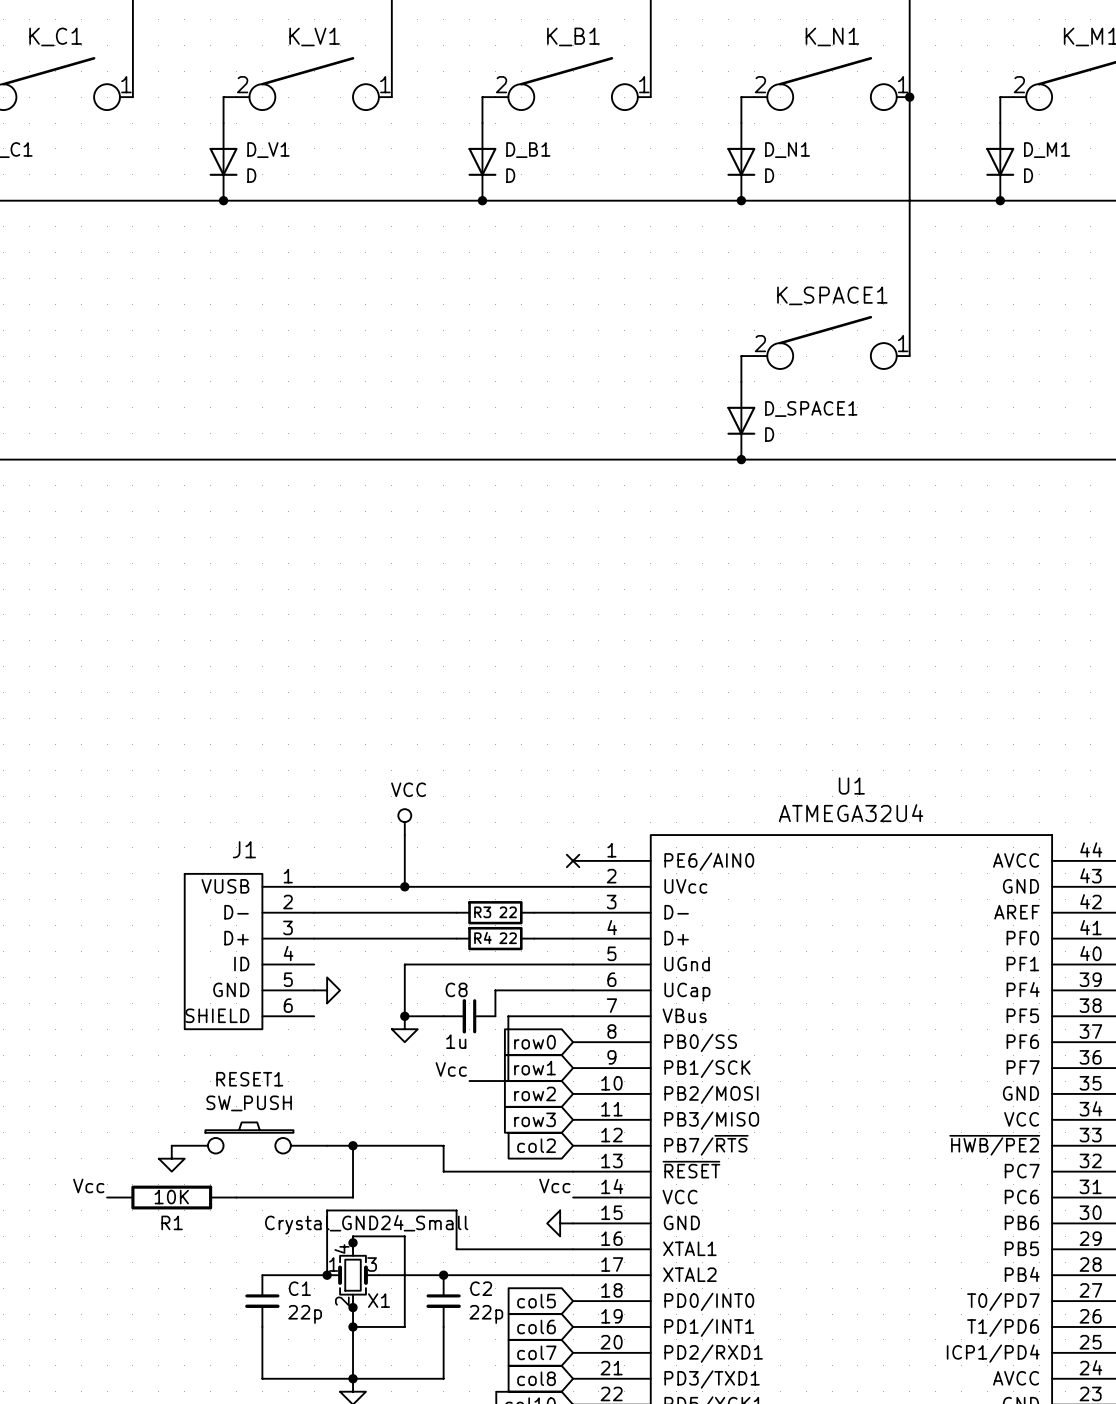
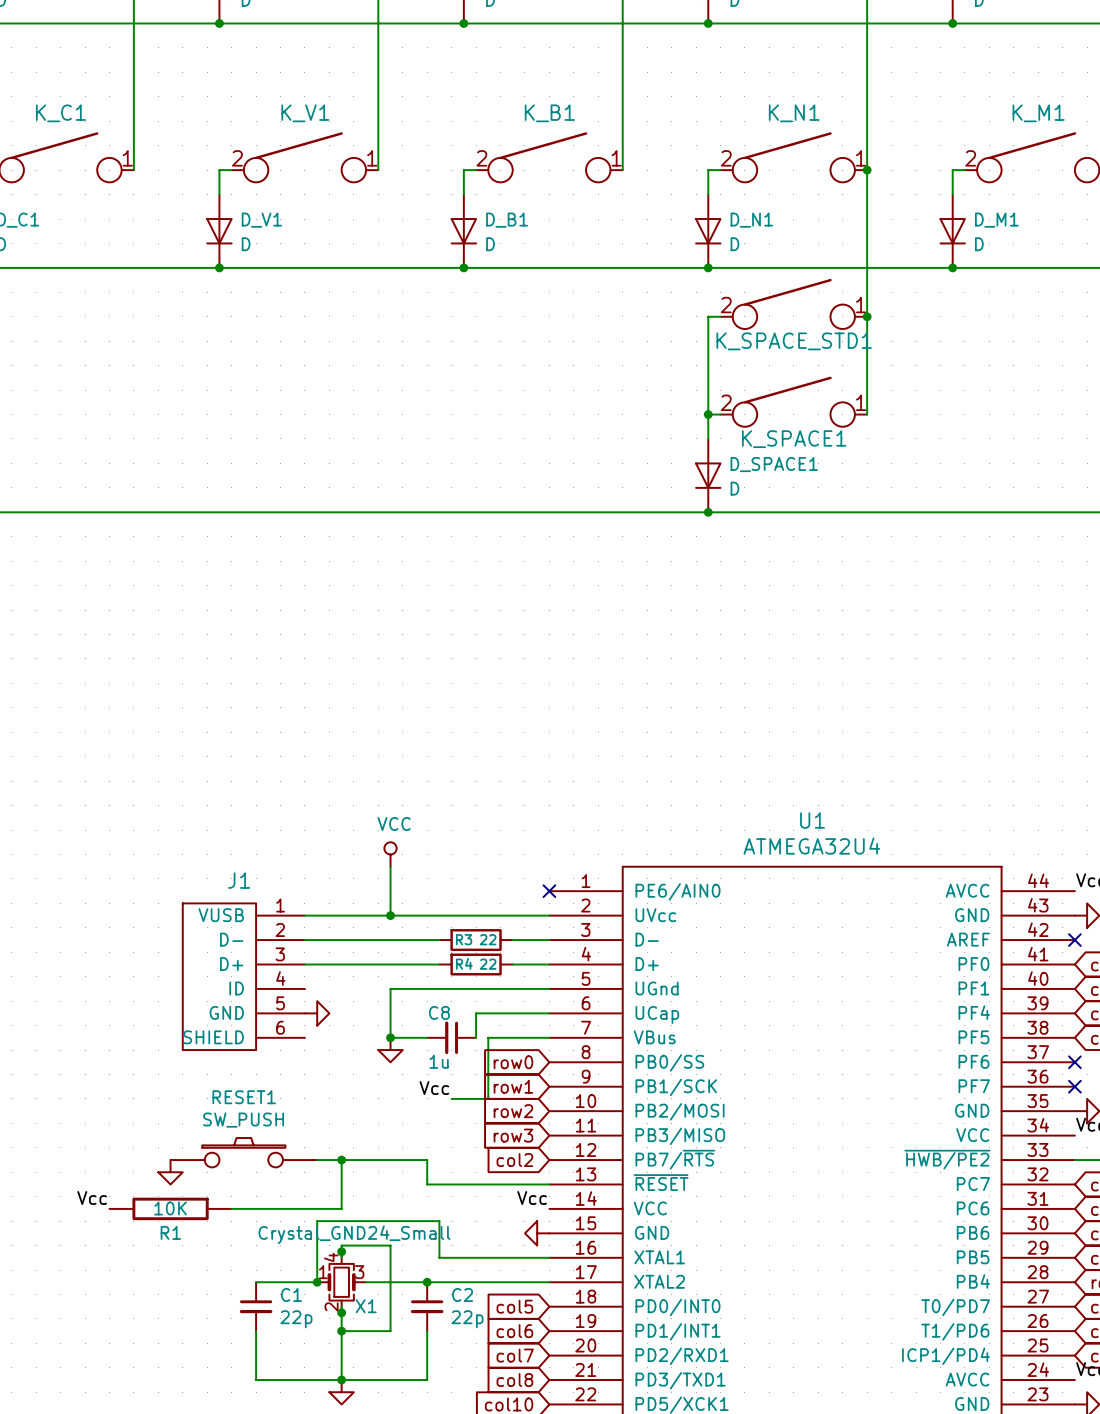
K_SPACE_STD1: none -> (793, 303)
wire: none -> (720, 316) (708, 316) (708, 414)
junction: none -> (867, 316)
K_SPACE1 name position: K_SPACE1 (832, 295) -> K_SPACE1 (794, 439)
junction: none -> (708, 414)

